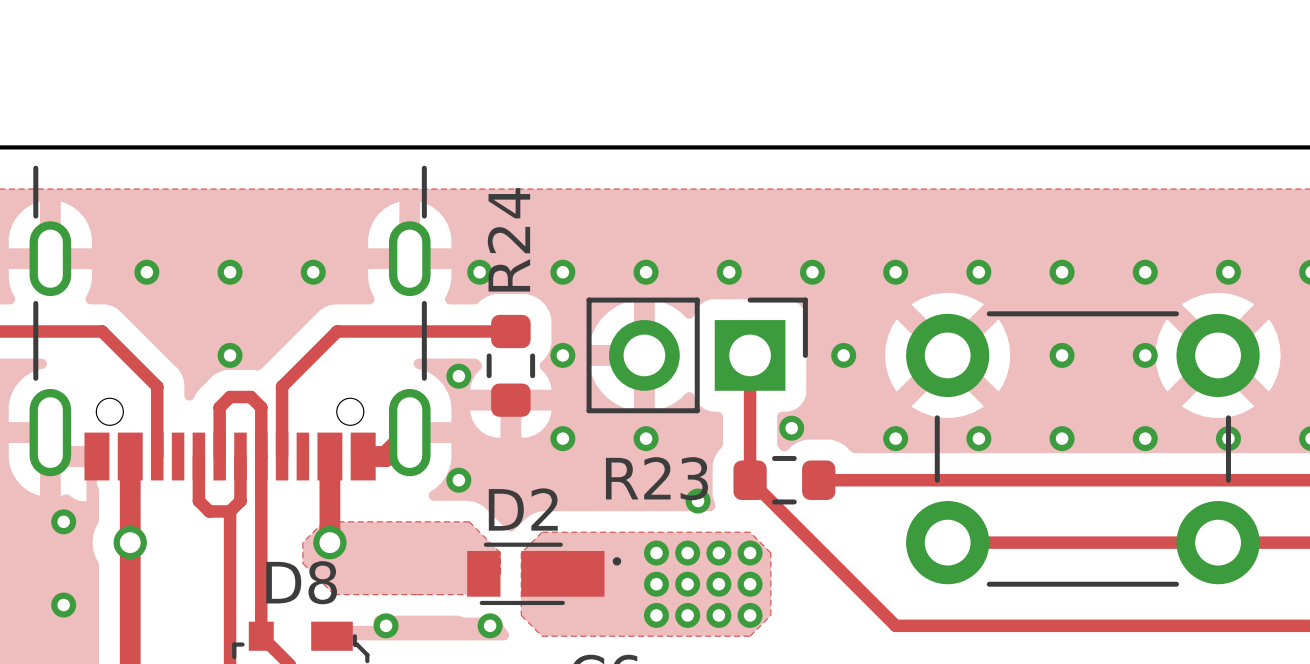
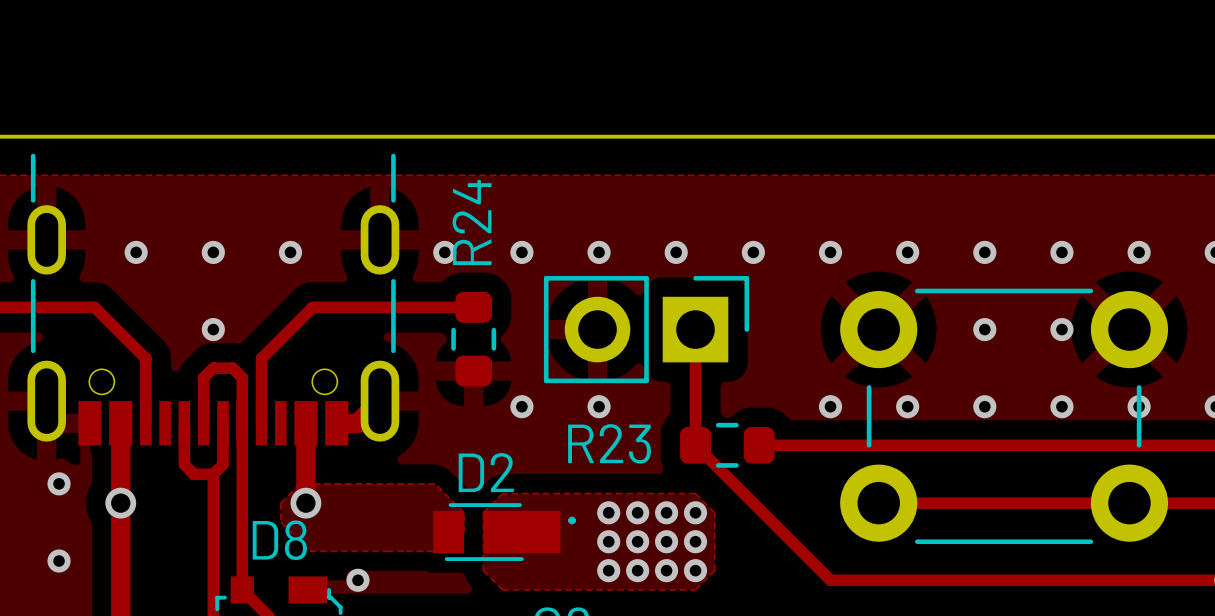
via: (562, 355) -> none
via: (843, 355) -> none
via: (458, 376) -> none
via: (791, 428) -> none
via: (458, 480) -> none
via: (698, 501) -> none
via: (490, 625) -> none

